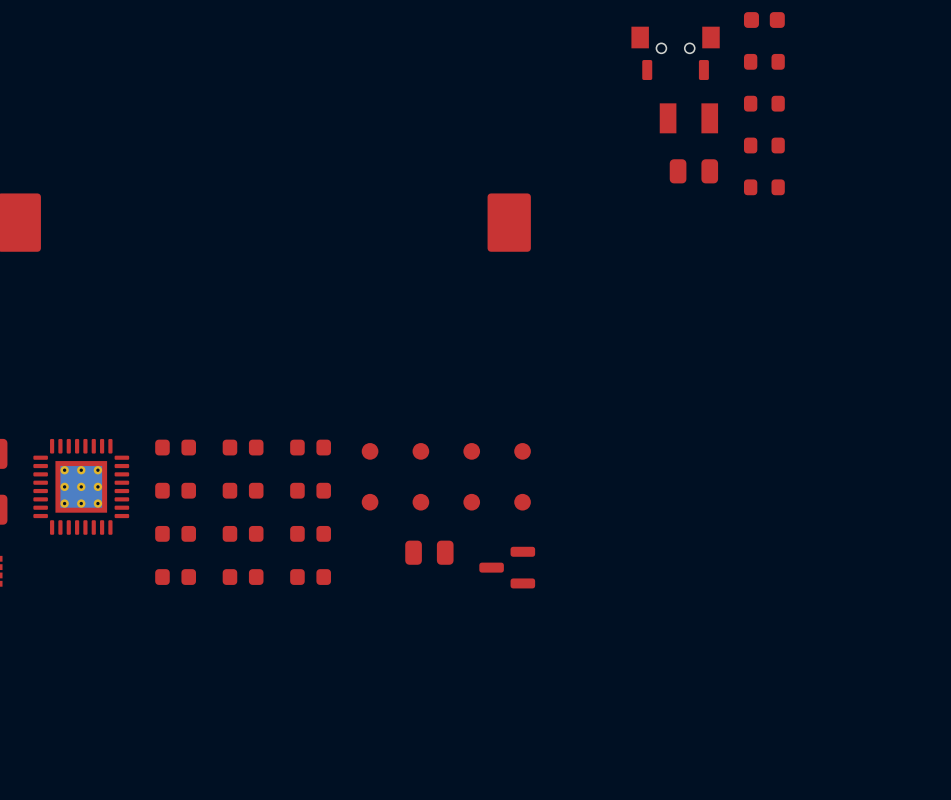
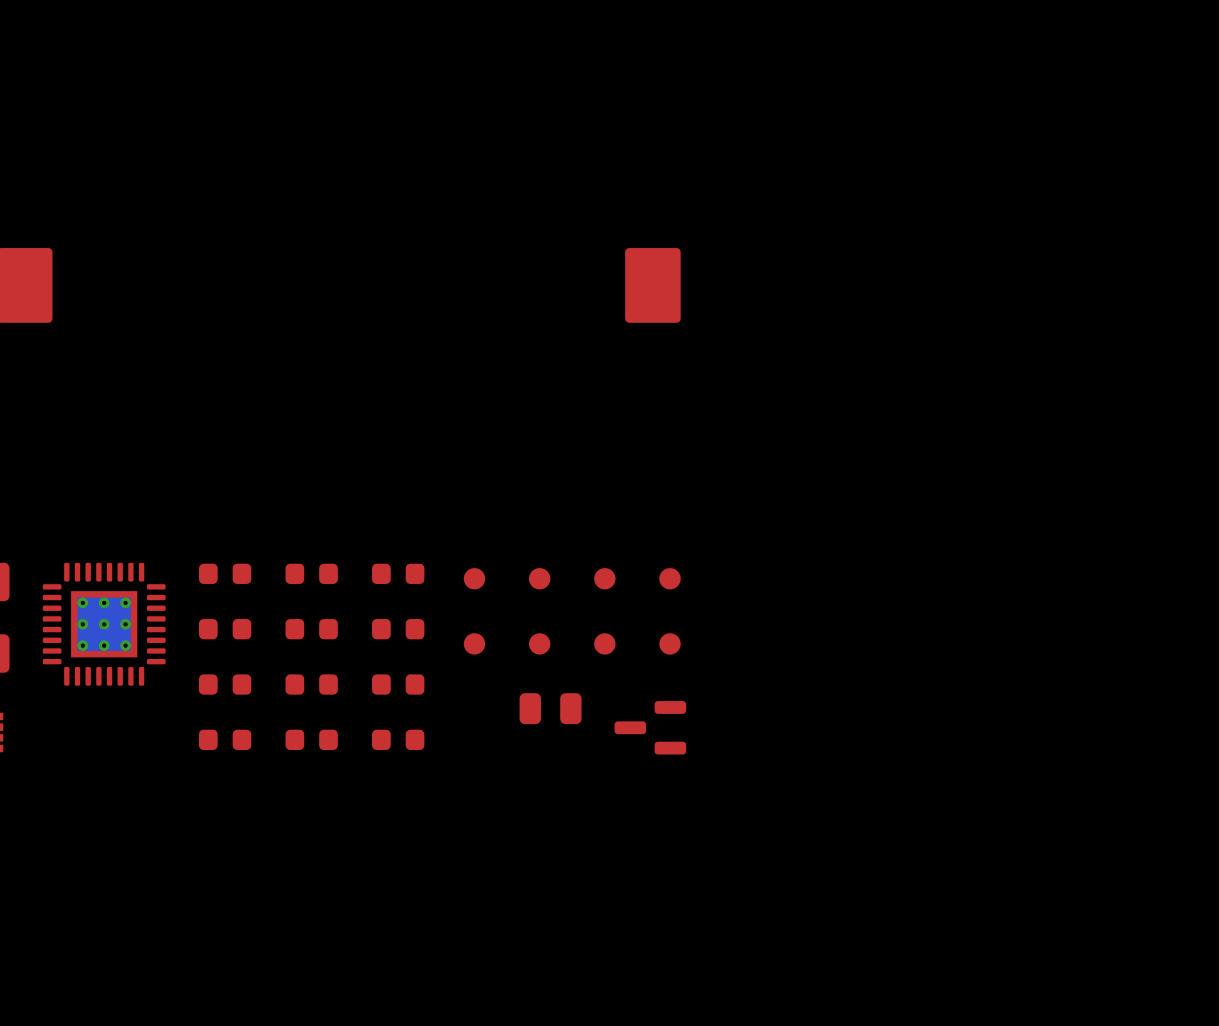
part: (764, 20) -> none
part: (675, 53) -> none
part: (764, 61) -> none
part: (764, 103) -> none
part: (688, 118) -> none
part: (764, 145) -> none
part: (693, 171) -> none
part: (764, 187) -> none

